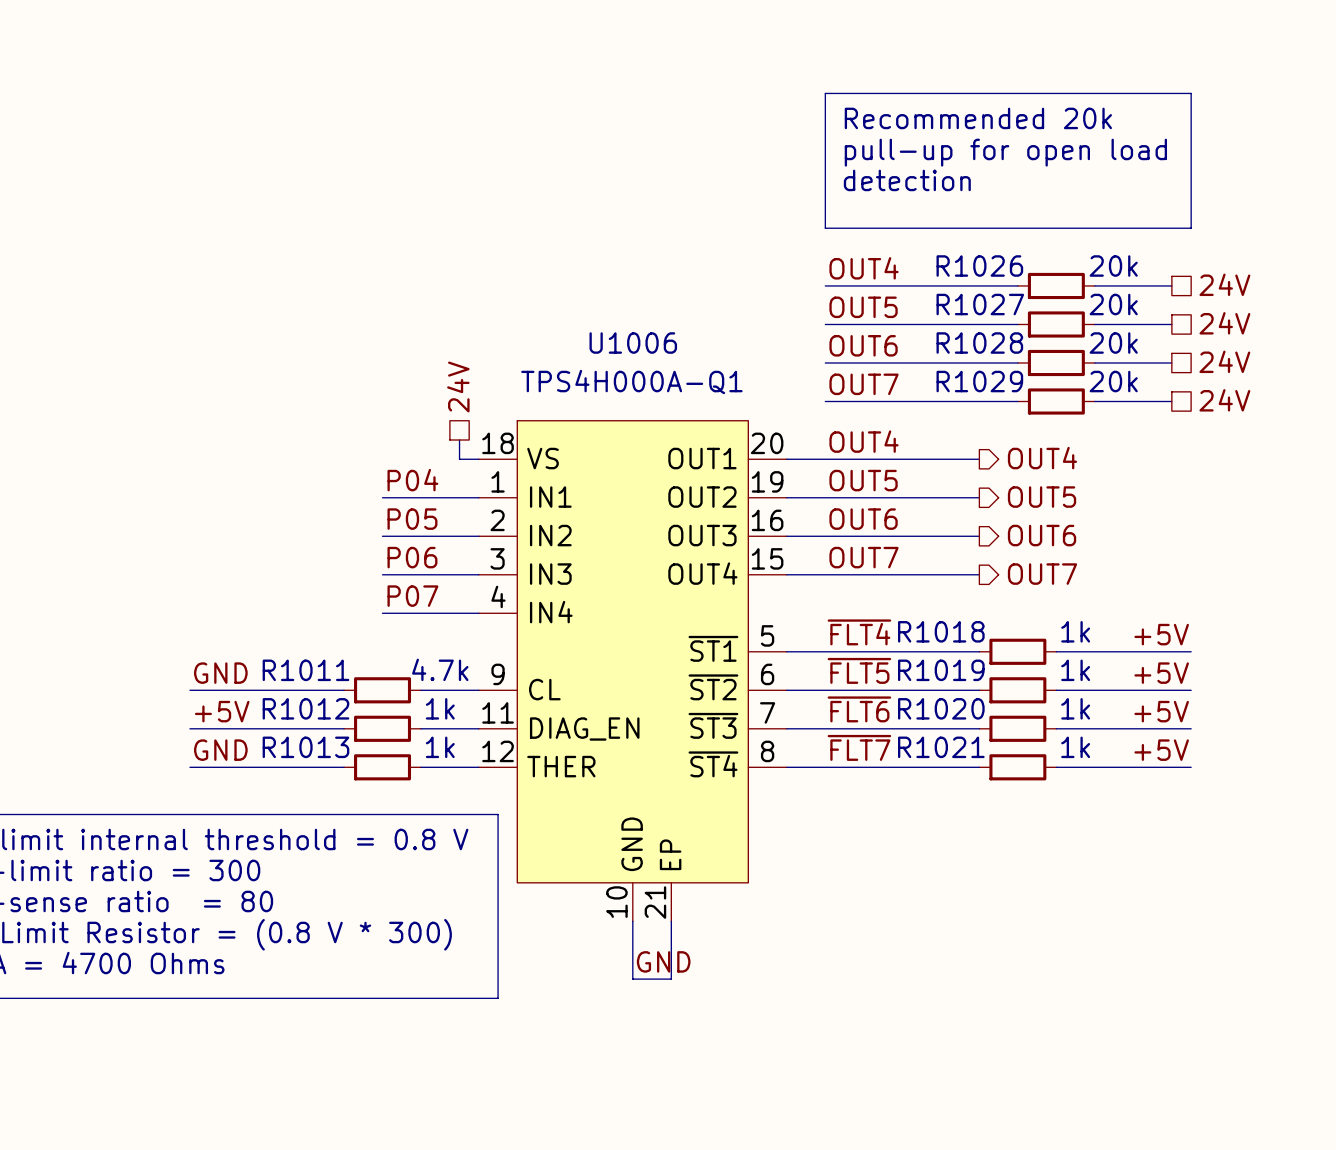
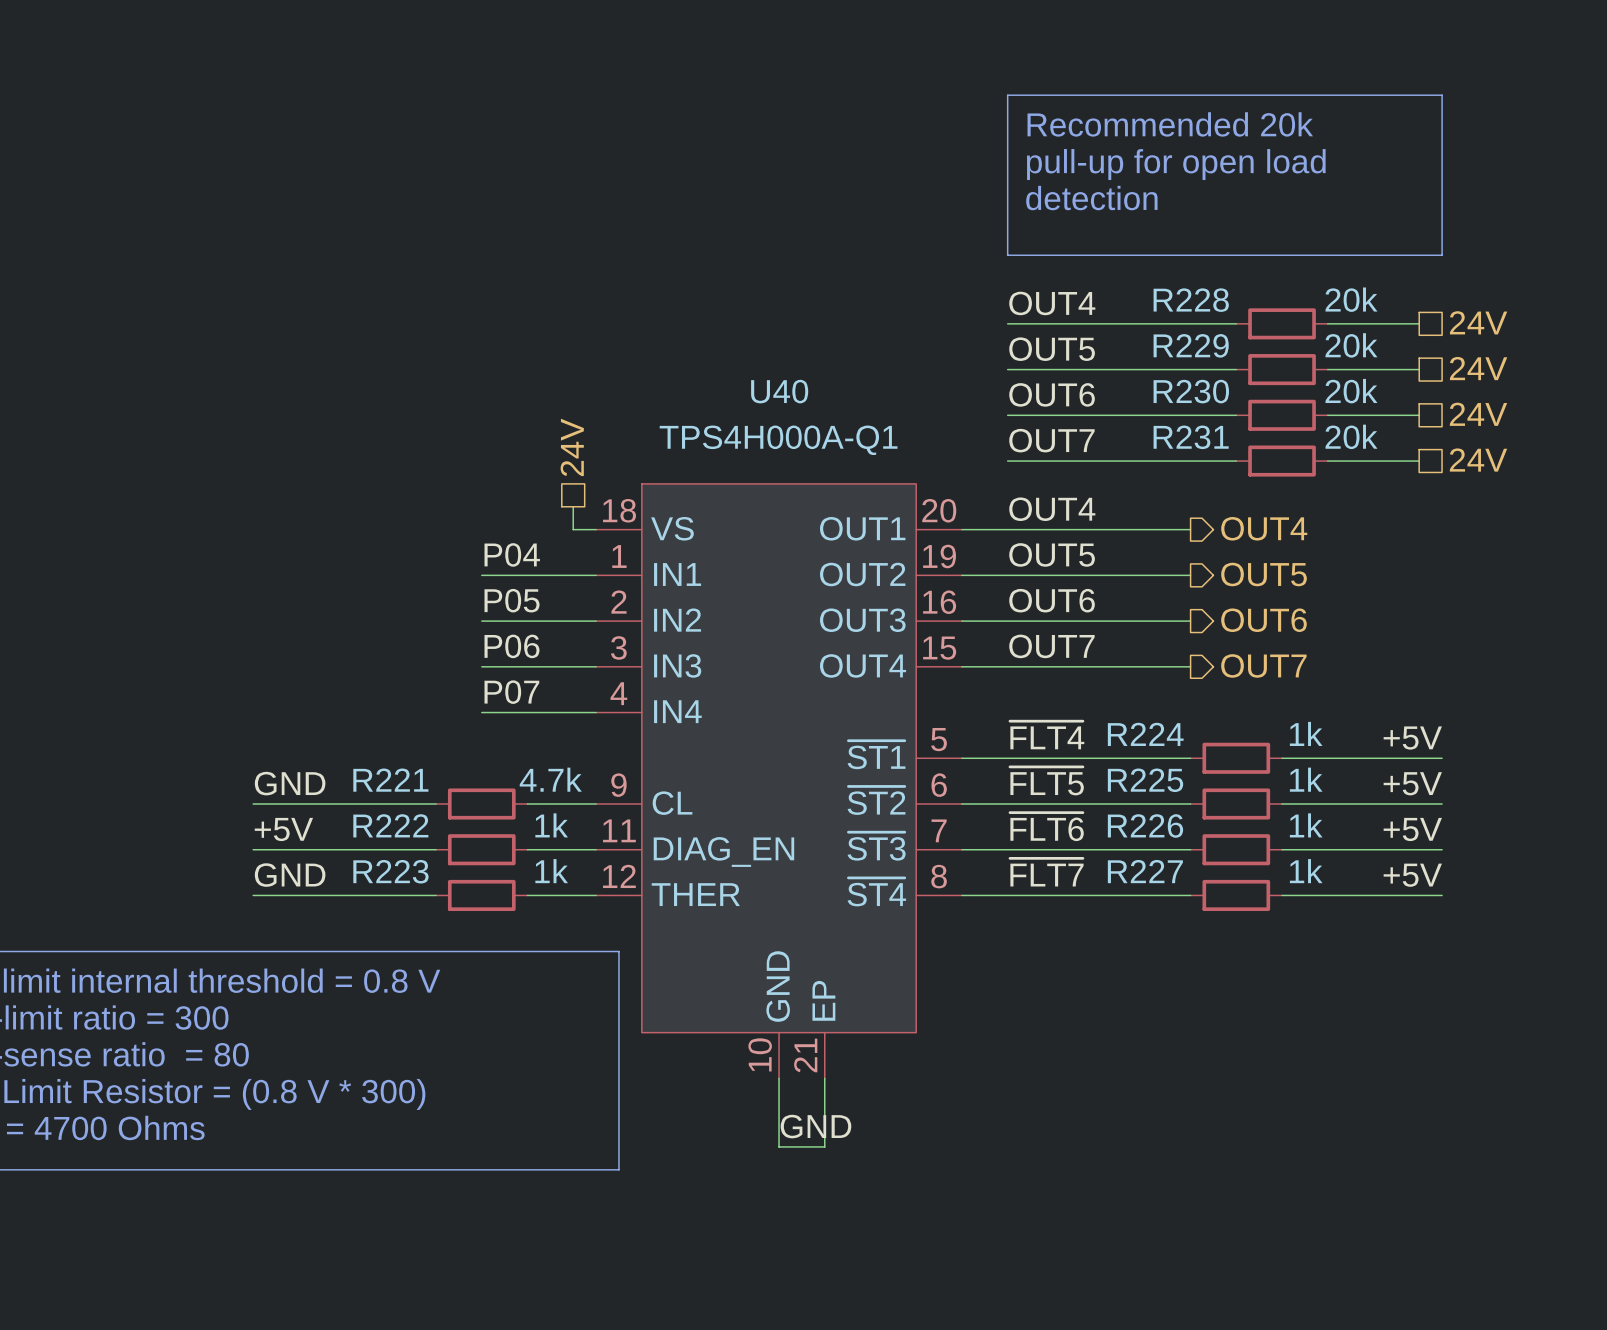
R1026 name: R1026 (979, 266) -> R228 (1191, 300)
R1027 name: R1027 (980, 304) -> R229 (1191, 345)
U1006 name: U1006 (633, 343) -> U40 (779, 391)
R1028 name: R1028 (979, 343) -> R230 (1191, 391)
R1029 name: R1029 (979, 381) -> R231 (1191, 437)
R1018 name: R1018 (941, 631) -> R224 (1145, 734)
R1011 name: R1011 (305, 670) -> R221 (390, 780)
R1019 name: R1019 (941, 670) -> R225 (1145, 780)
R1012 name: R1012 (305, 708) -> R222 (390, 825)
R1020 name: R1020 (941, 708) -> R226 (1145, 826)
R1013 name: R1013 (305, 747) -> R223 (390, 871)
R1021 name: R1021 (941, 747) -> R227 (1145, 871)

